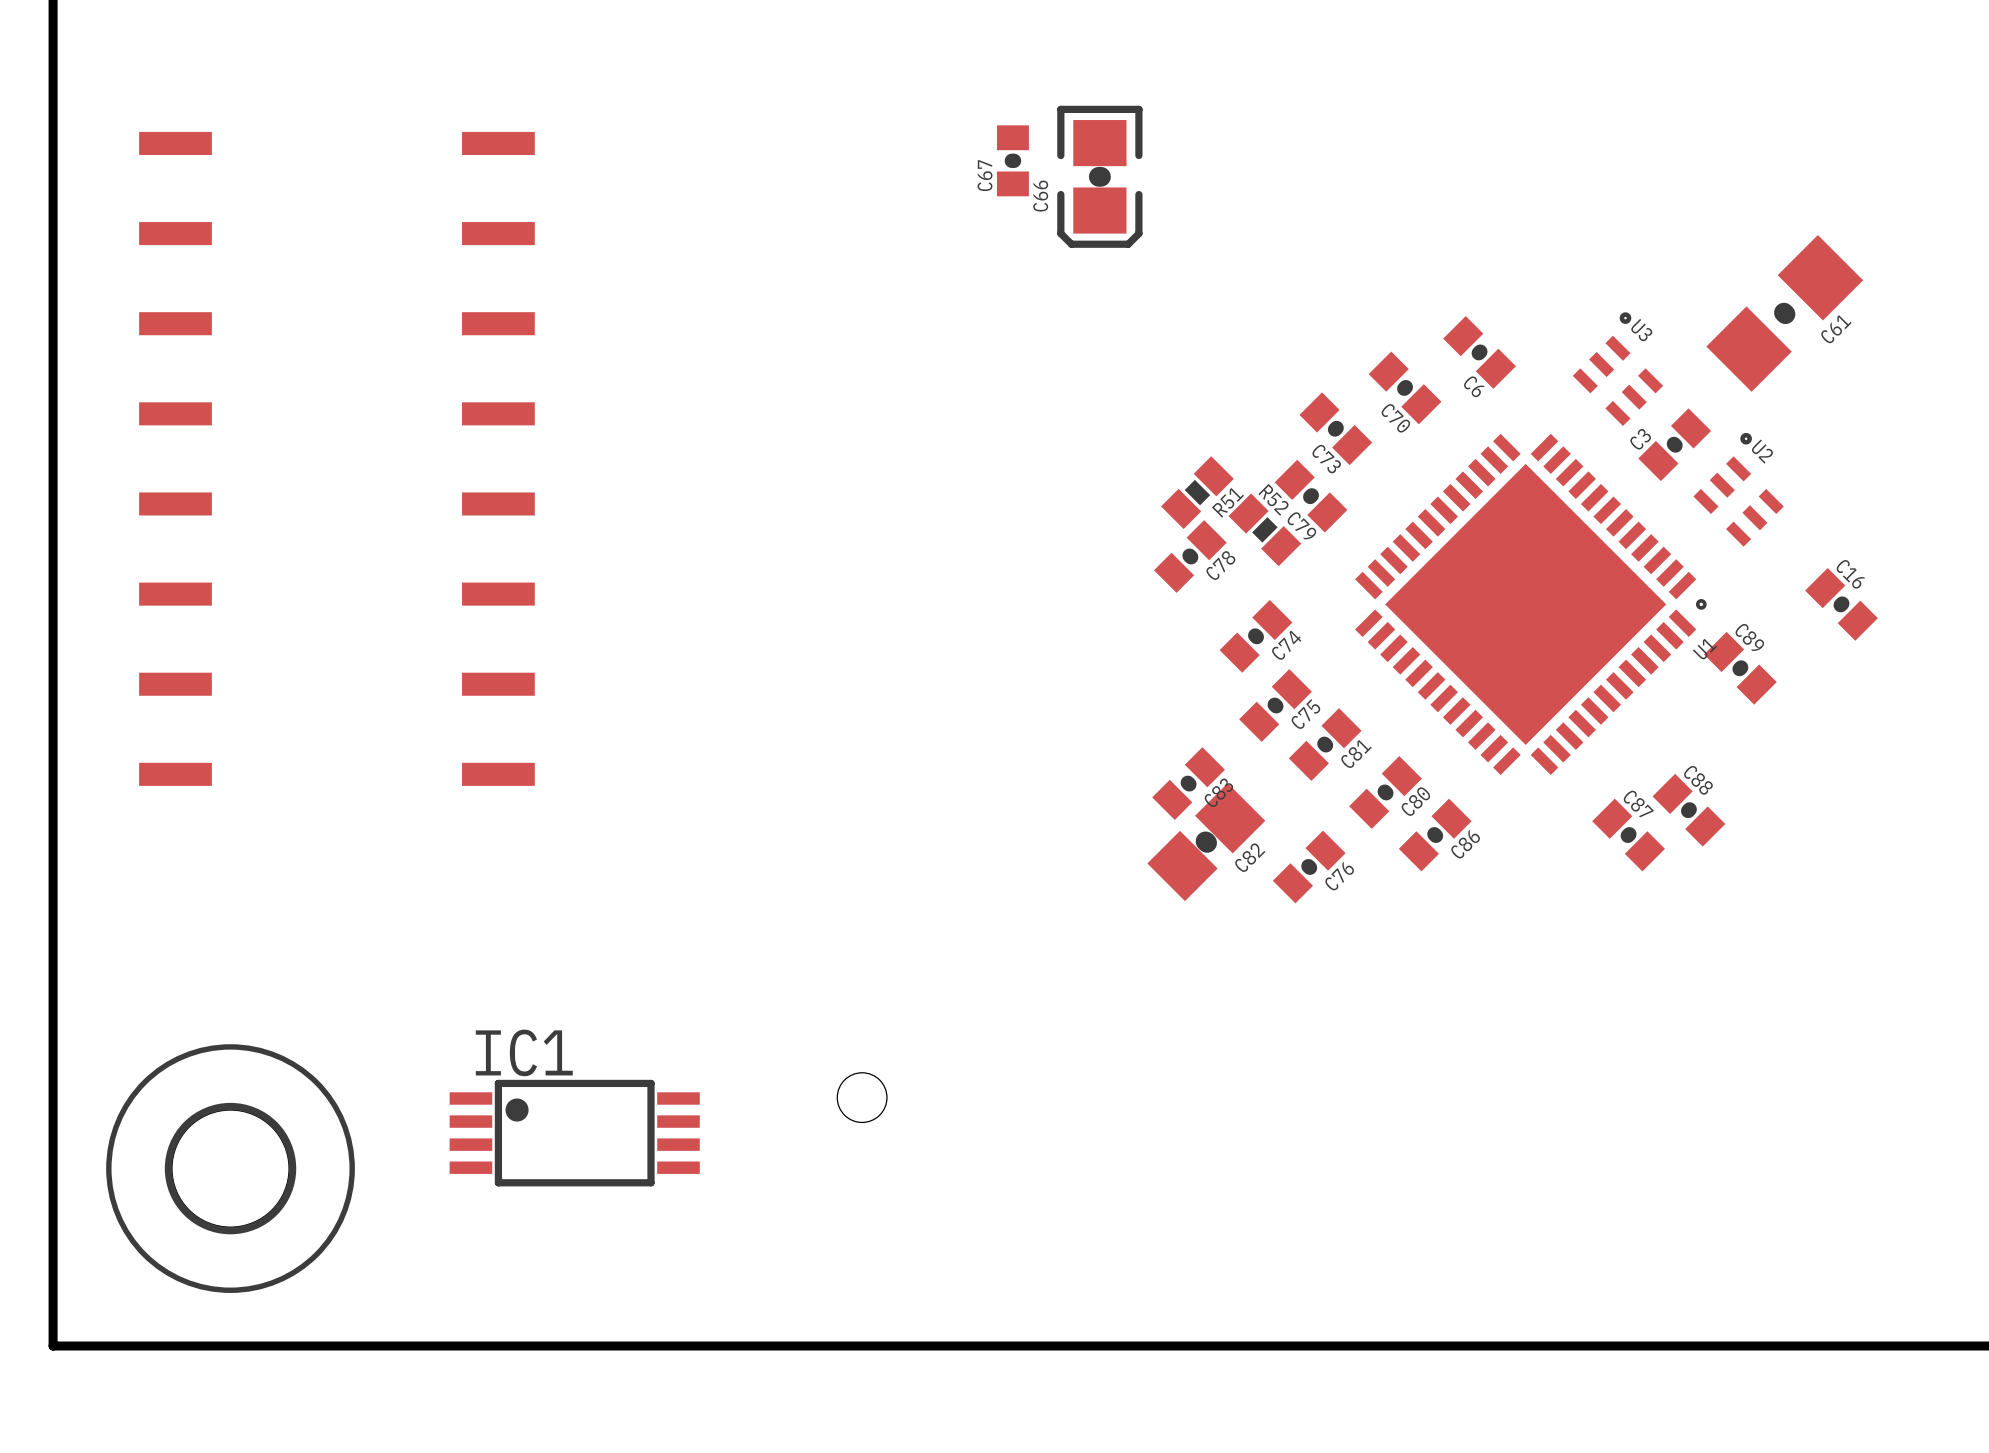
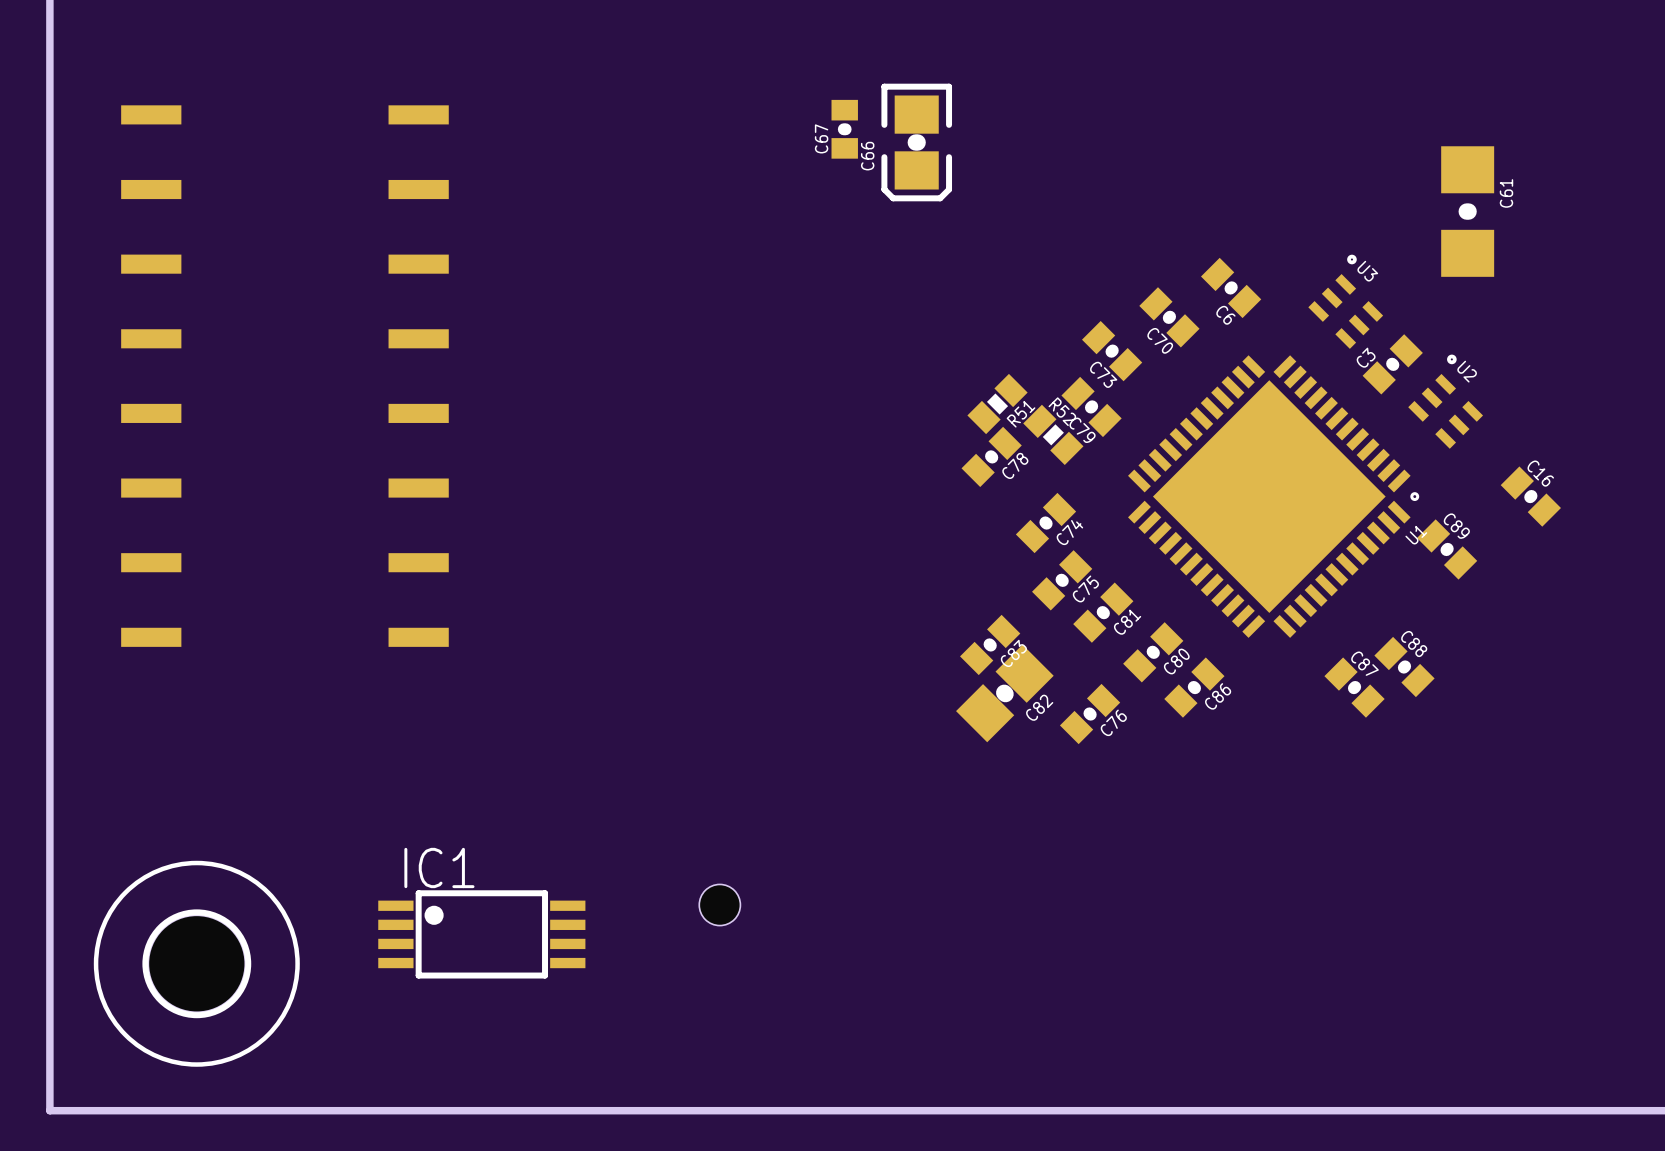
C61 rotation: 0° (1784, 313) -> 45° counterclockwise (1467, 211)

